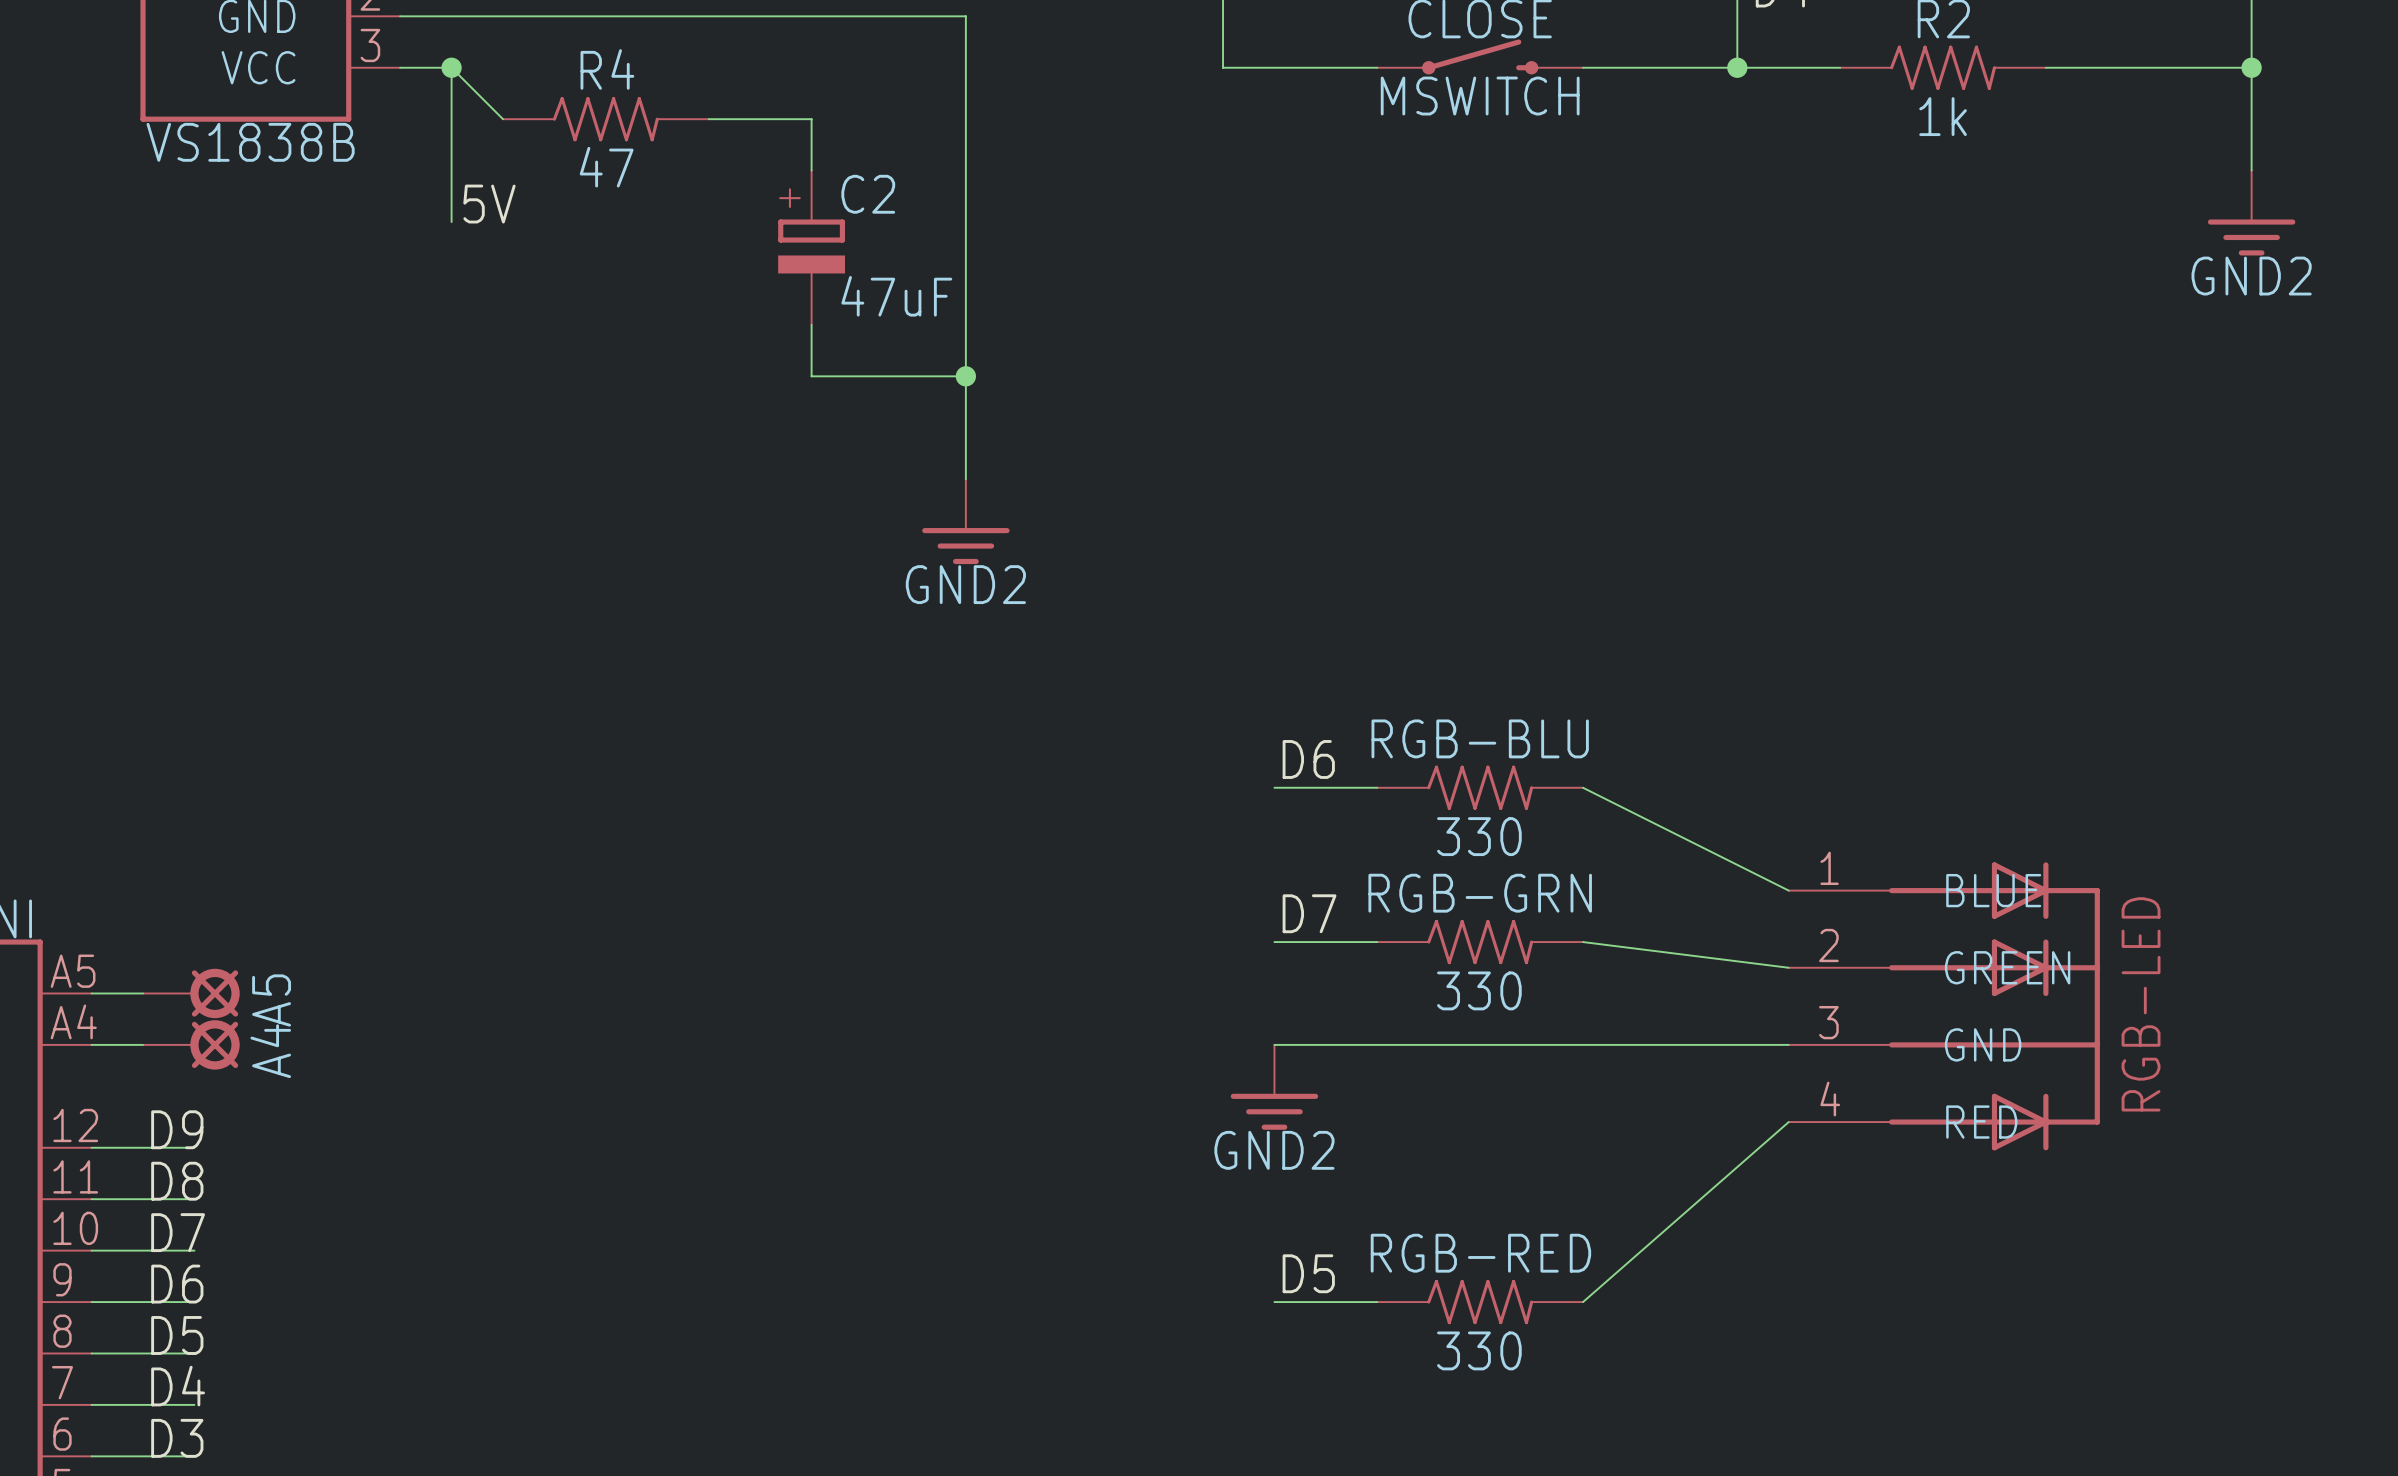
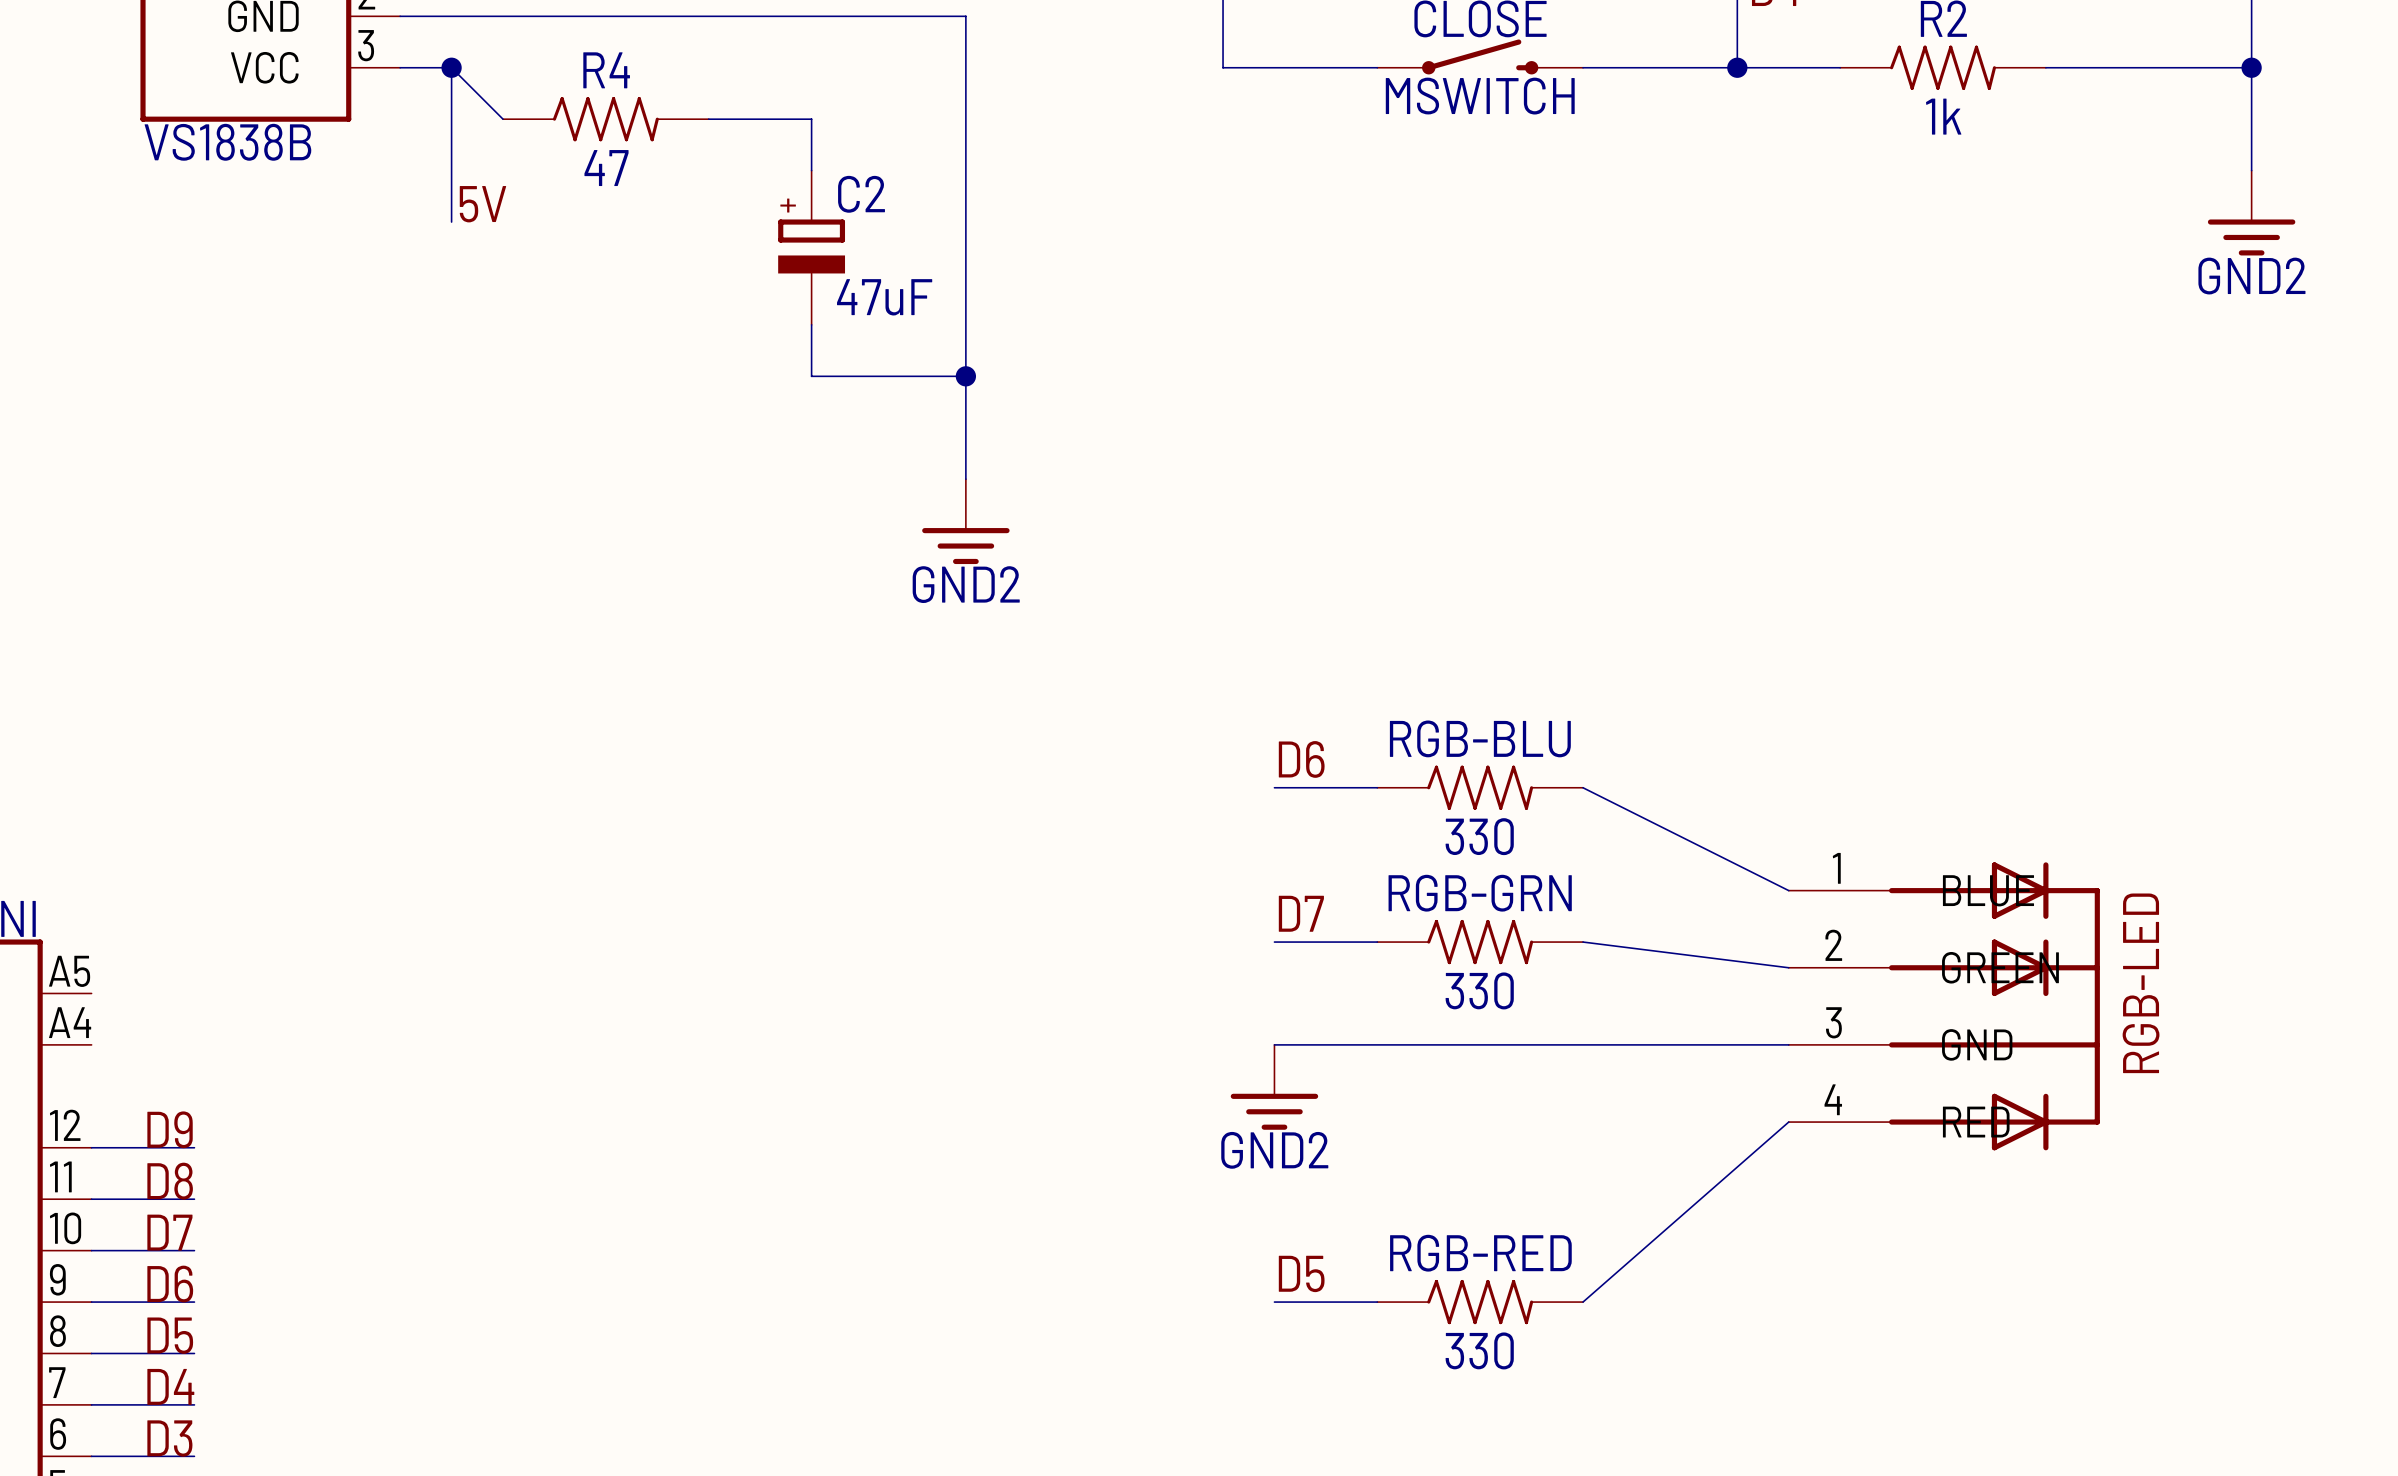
wire: (91, 993) (143, 993) -> none
A5: (191, 993) -> none
wire: (91, 1044) (143, 1044) -> none
A4: (191, 1044) -> none

